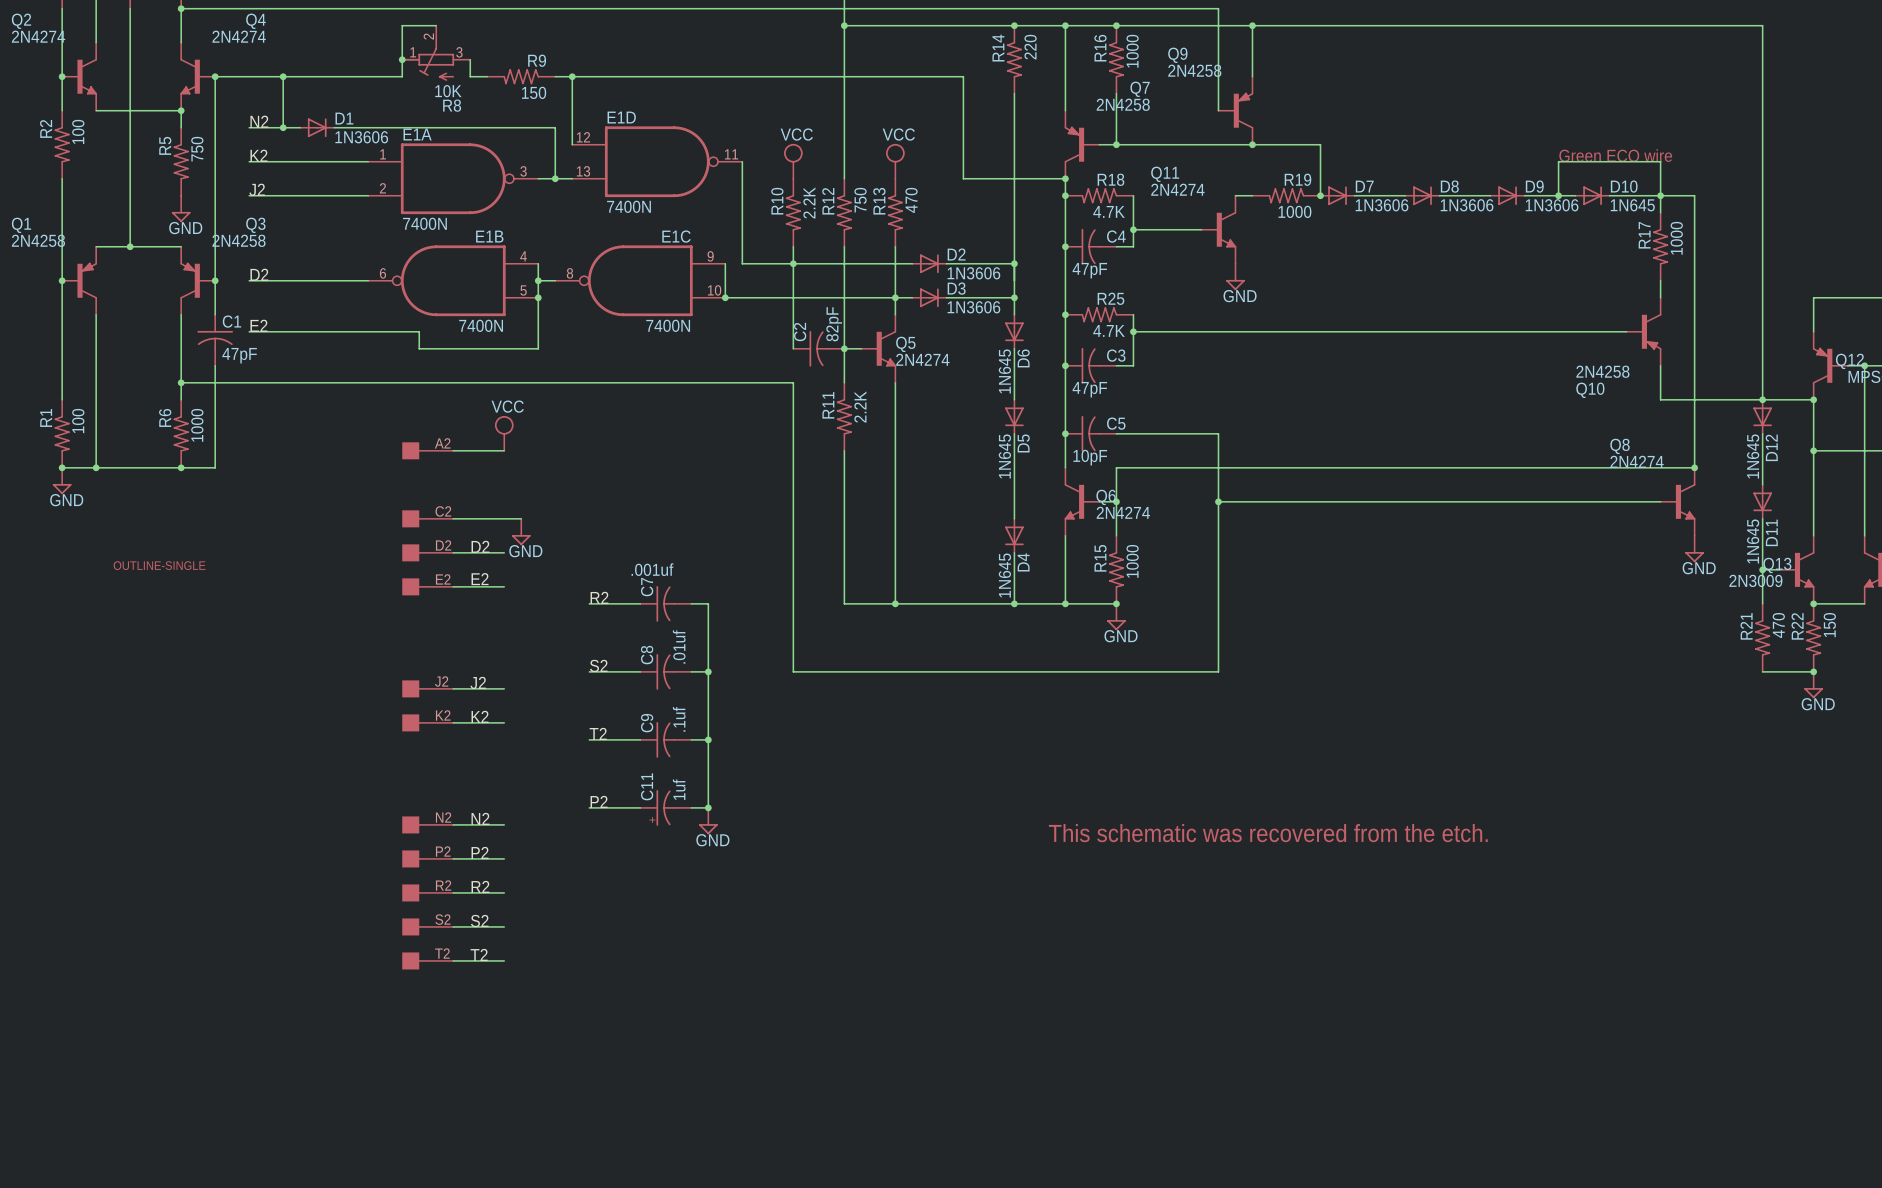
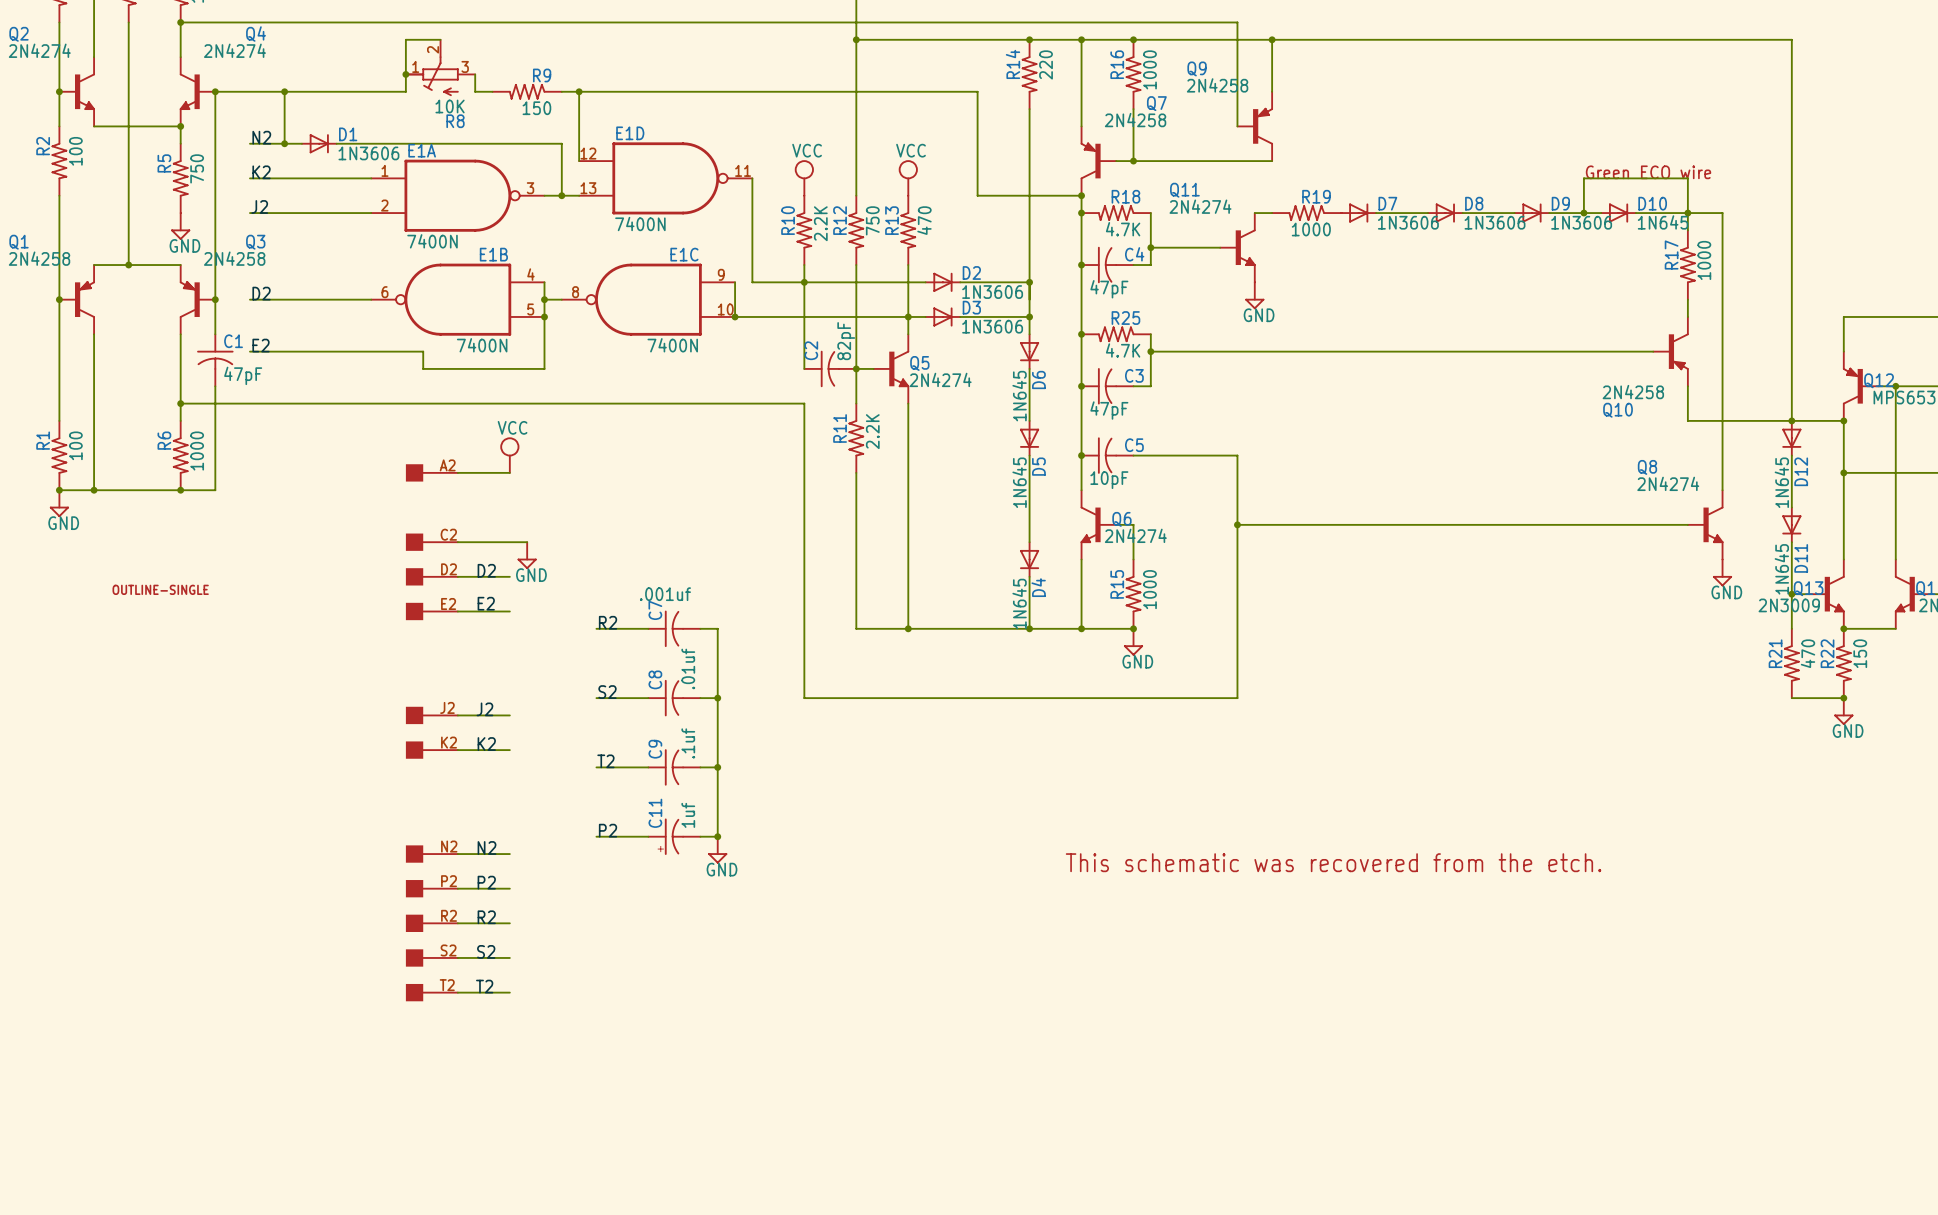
wire: (1252, 144) (1320, 144) (1320, 195) -> none
junction: (1252, 144) -> none
junction: (1320, 195) -> none
wire: (1694, 467) (1116, 467) (1116, 501) -> none
junction: (1694, 467) -> none
junction: (1116, 501) -> none

